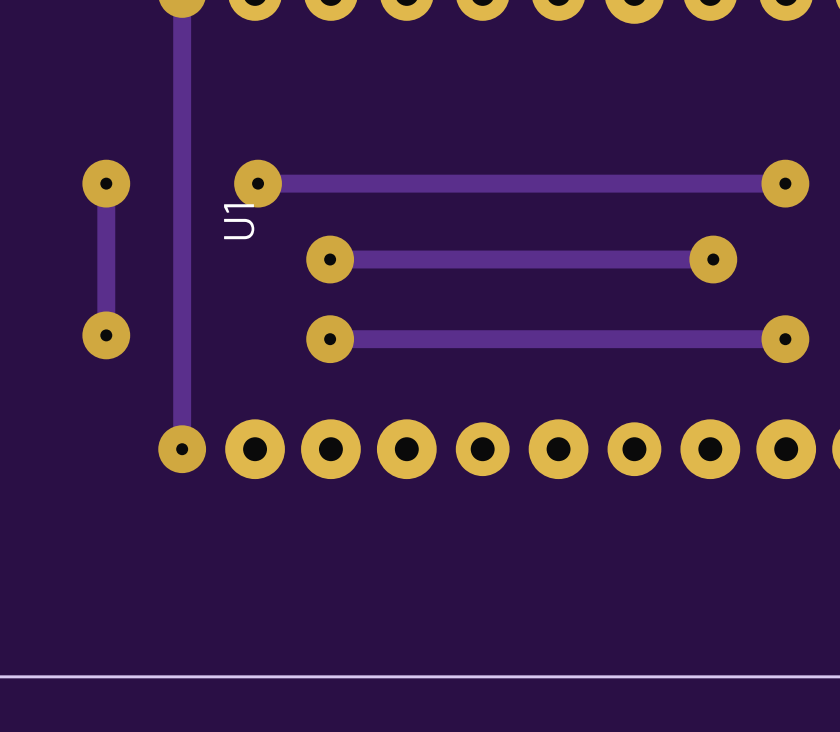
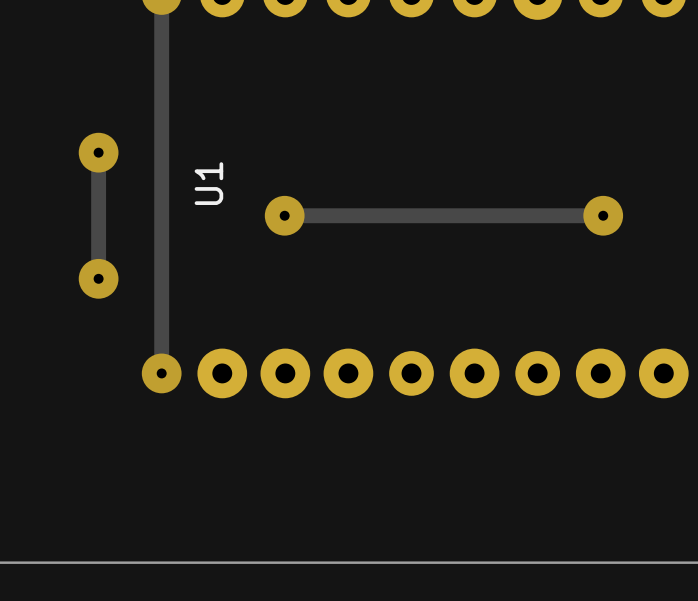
track: (258, 183) (785, 183) -> none
via: (258, 183) -> none
via: (785, 183) -> none
via: (330, 339) -> none
track: (333, 339) (785, 339) -> none
via: (785, 339) -> none

